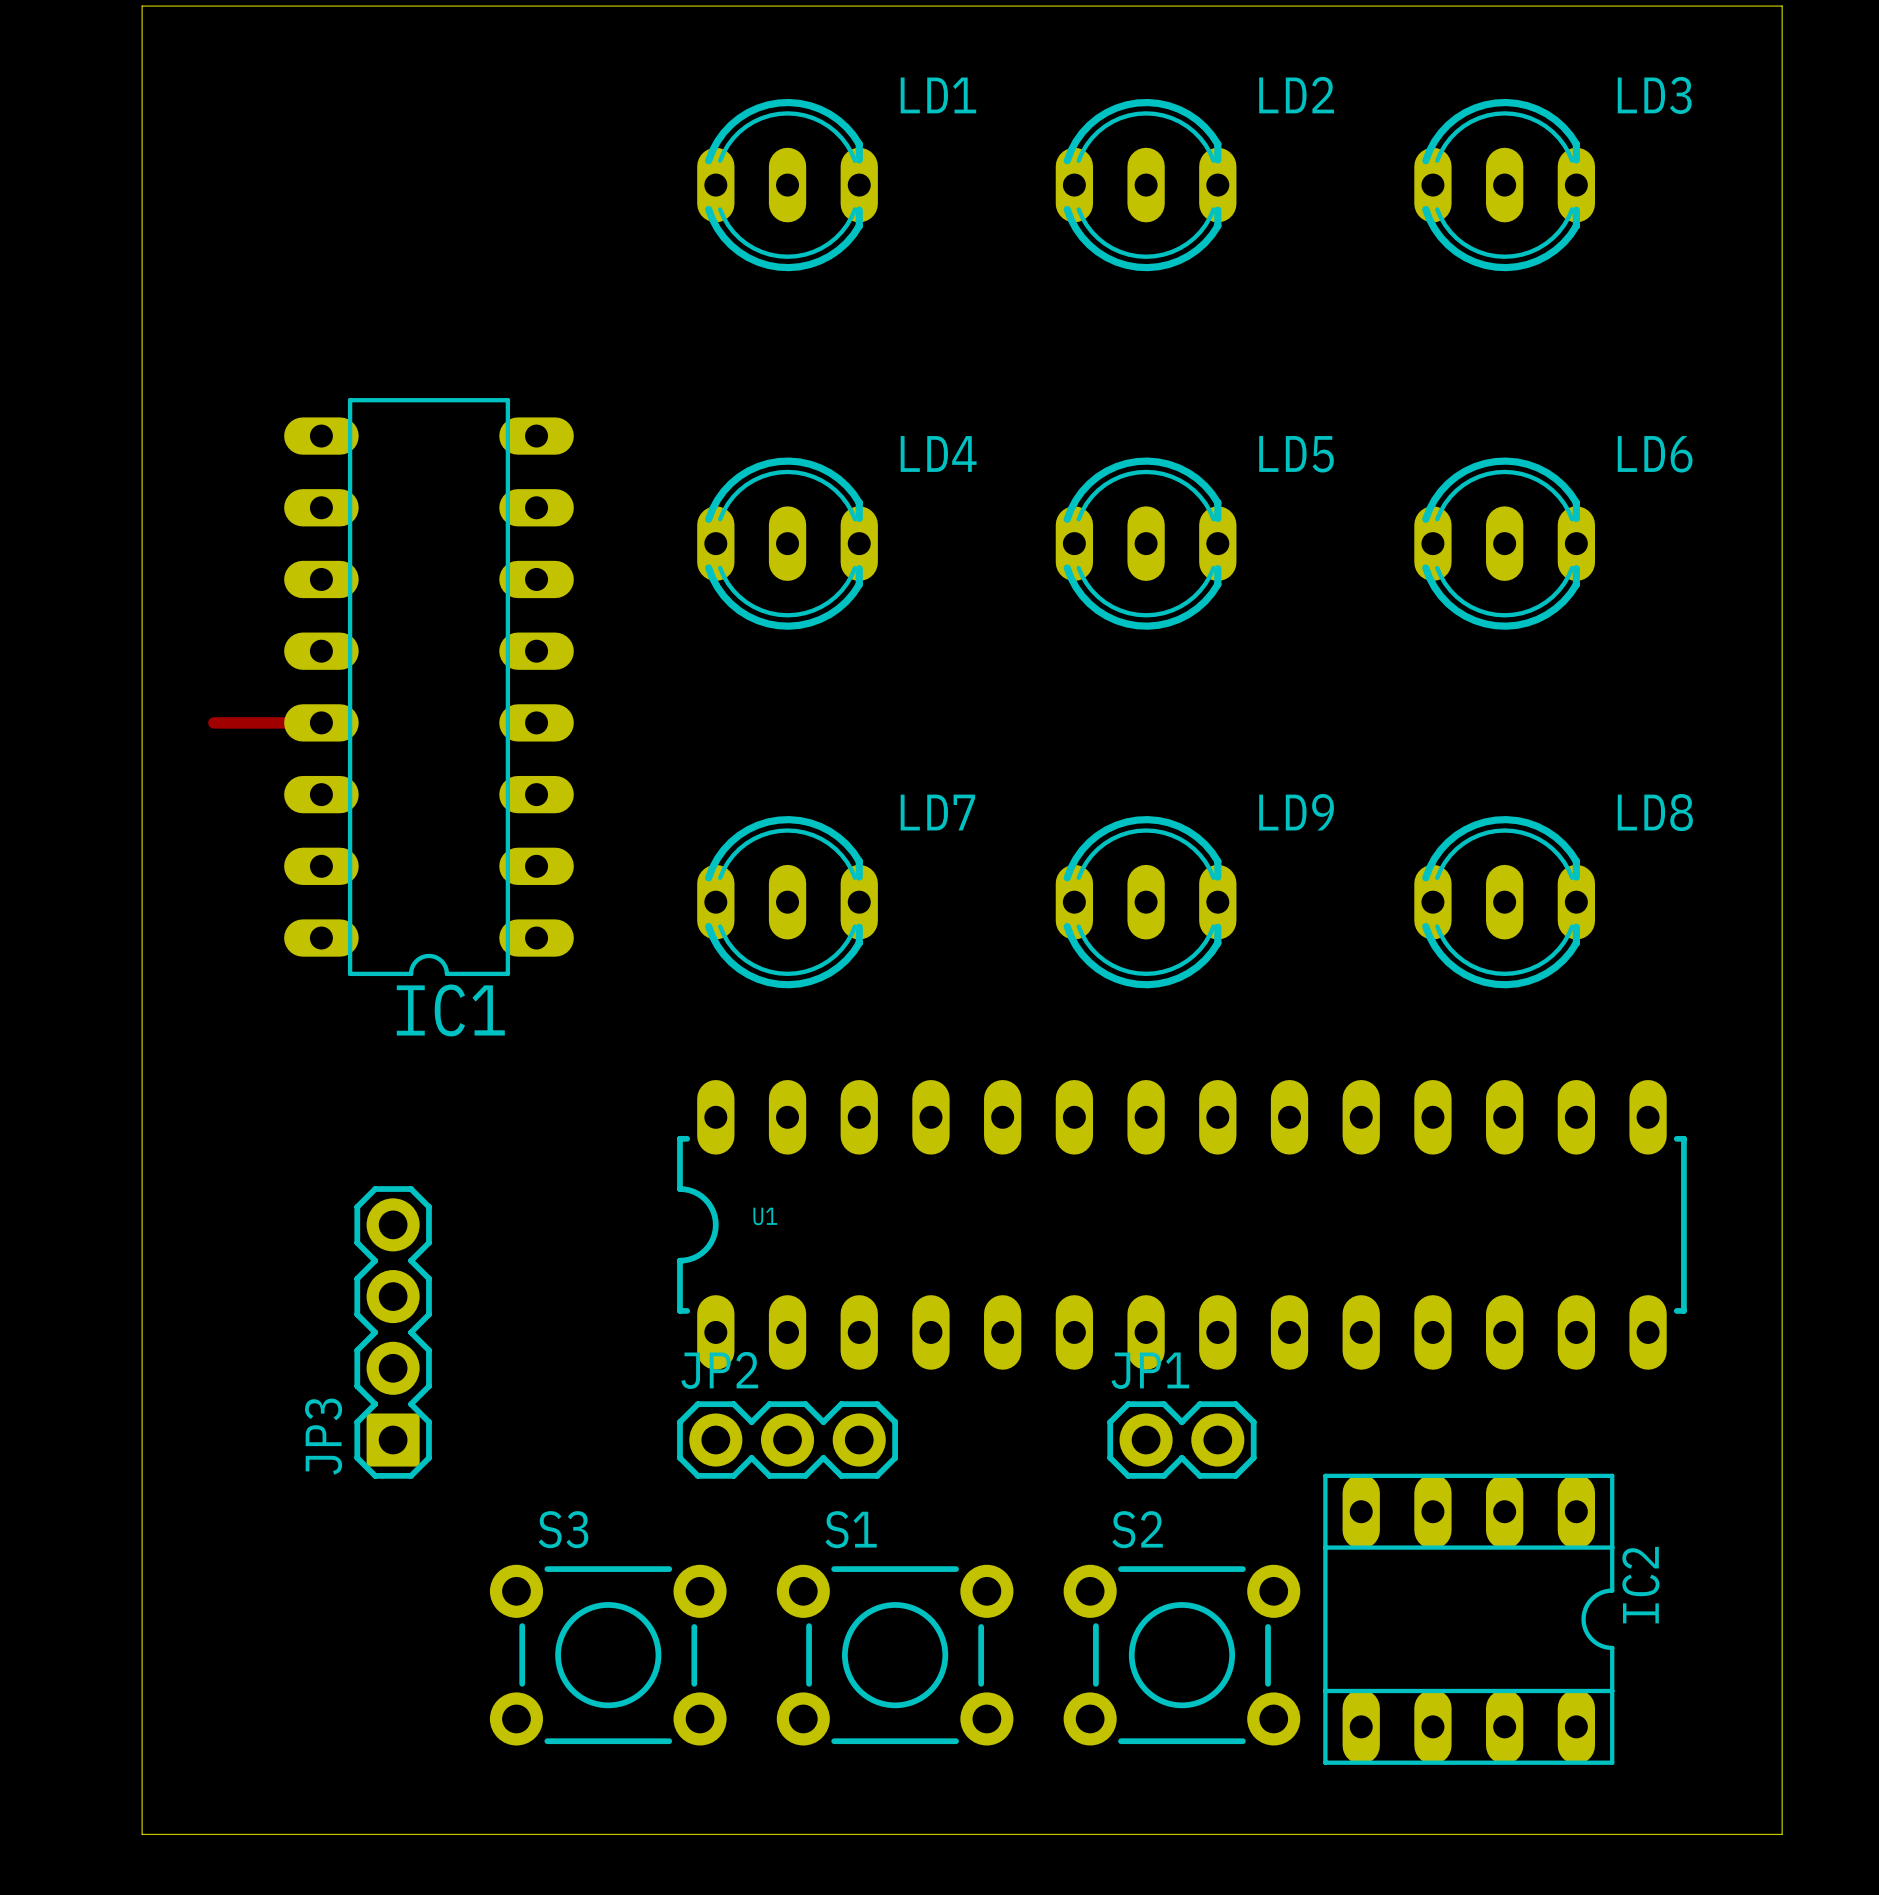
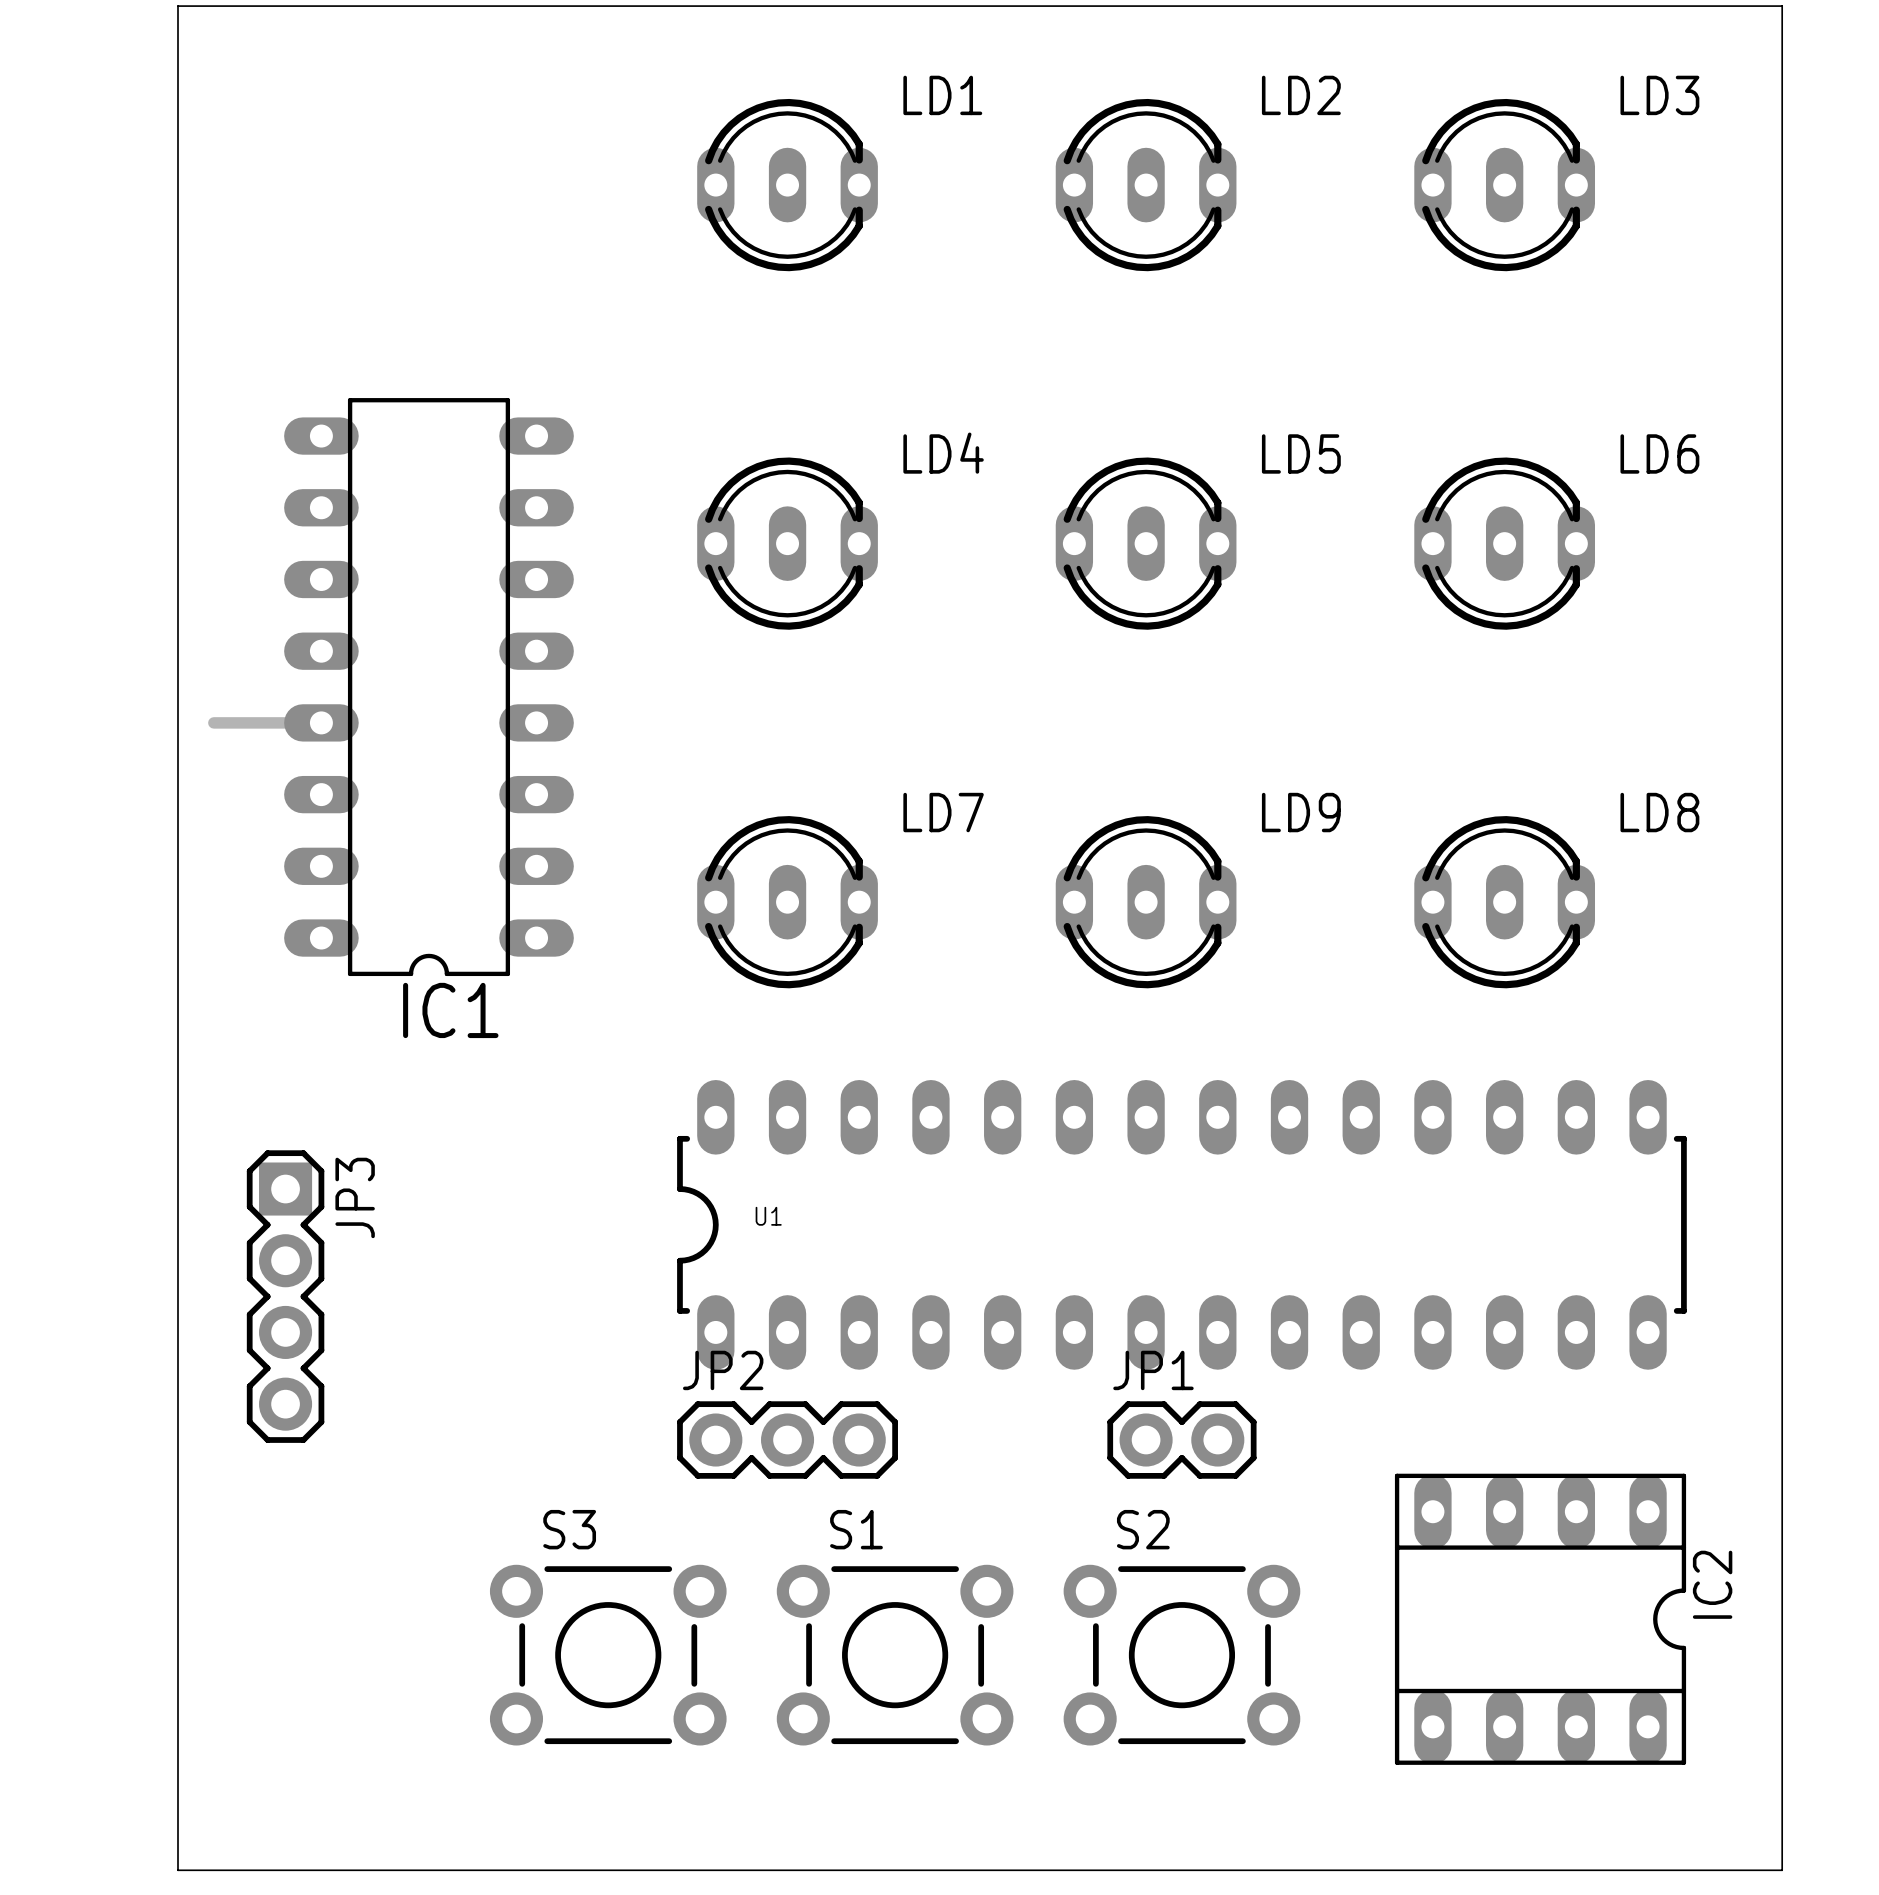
board edge: (177, 6) (142, 6) (142, 1834) (1782, 1834) -> (177, 6) (177, 1870) (1782, 1870) (1782, 1834)
JP3 rotation: 0° (393, 1332) -> 180° (285, 1296)
IC2 position: (1468, 1619) -> (1540, 1619)

